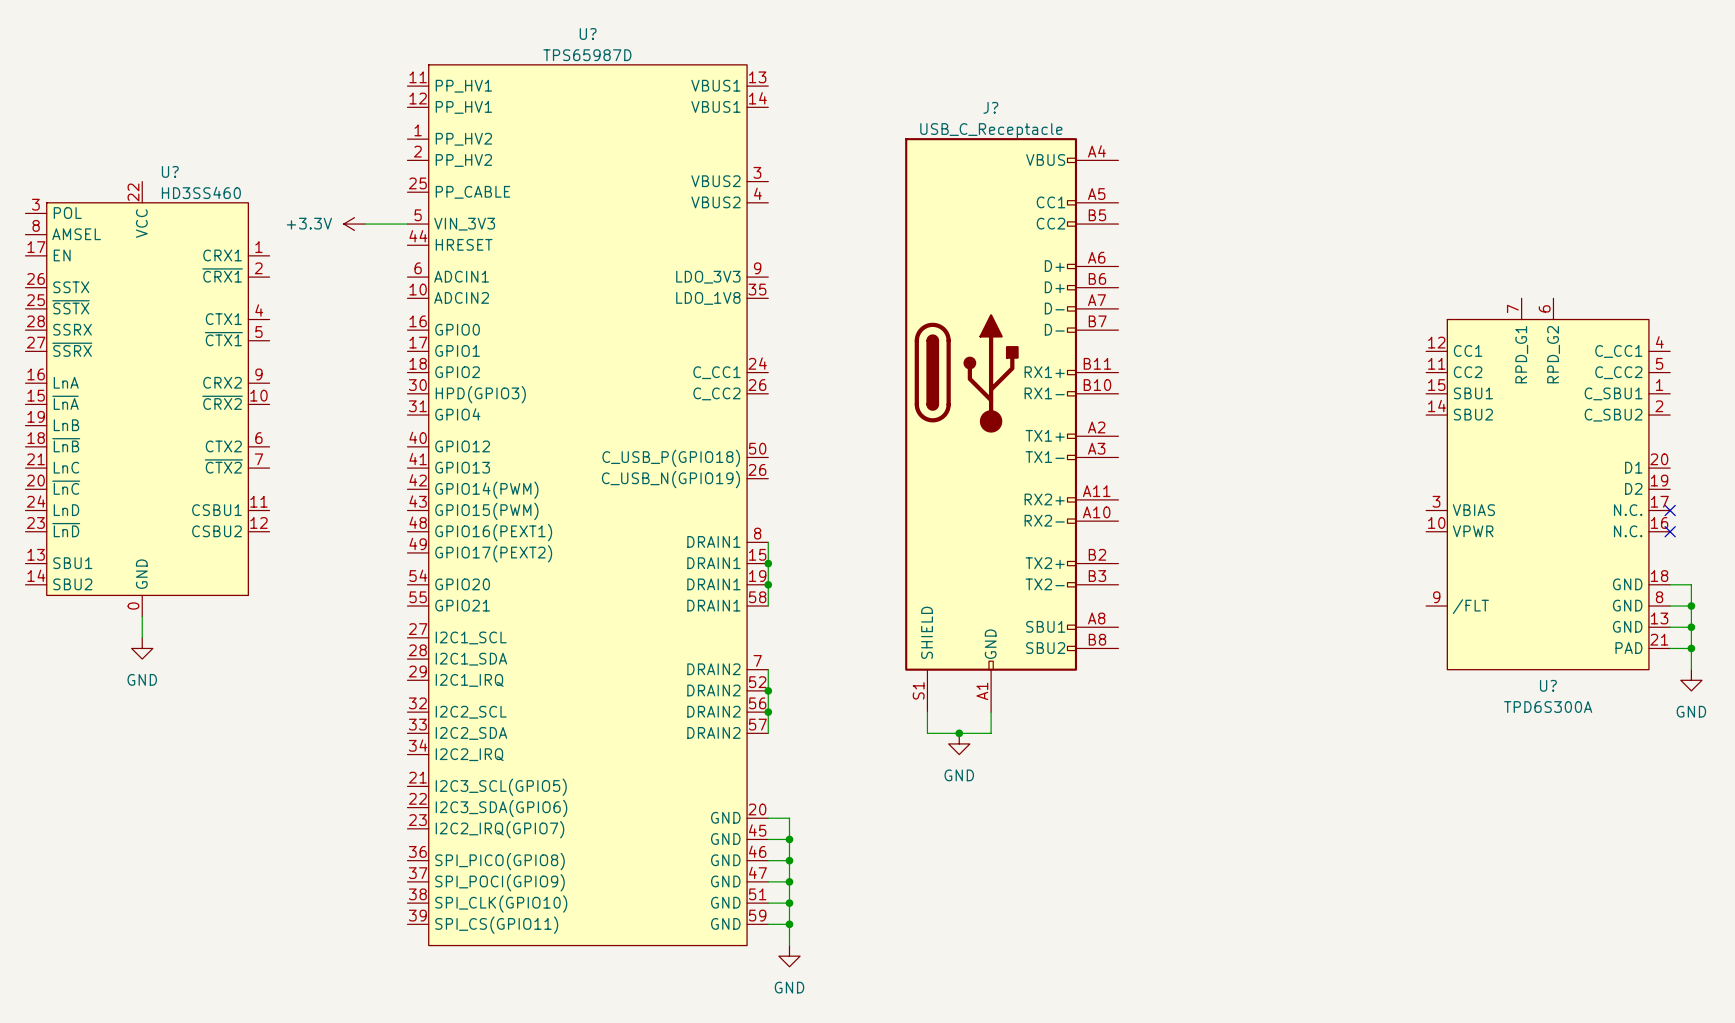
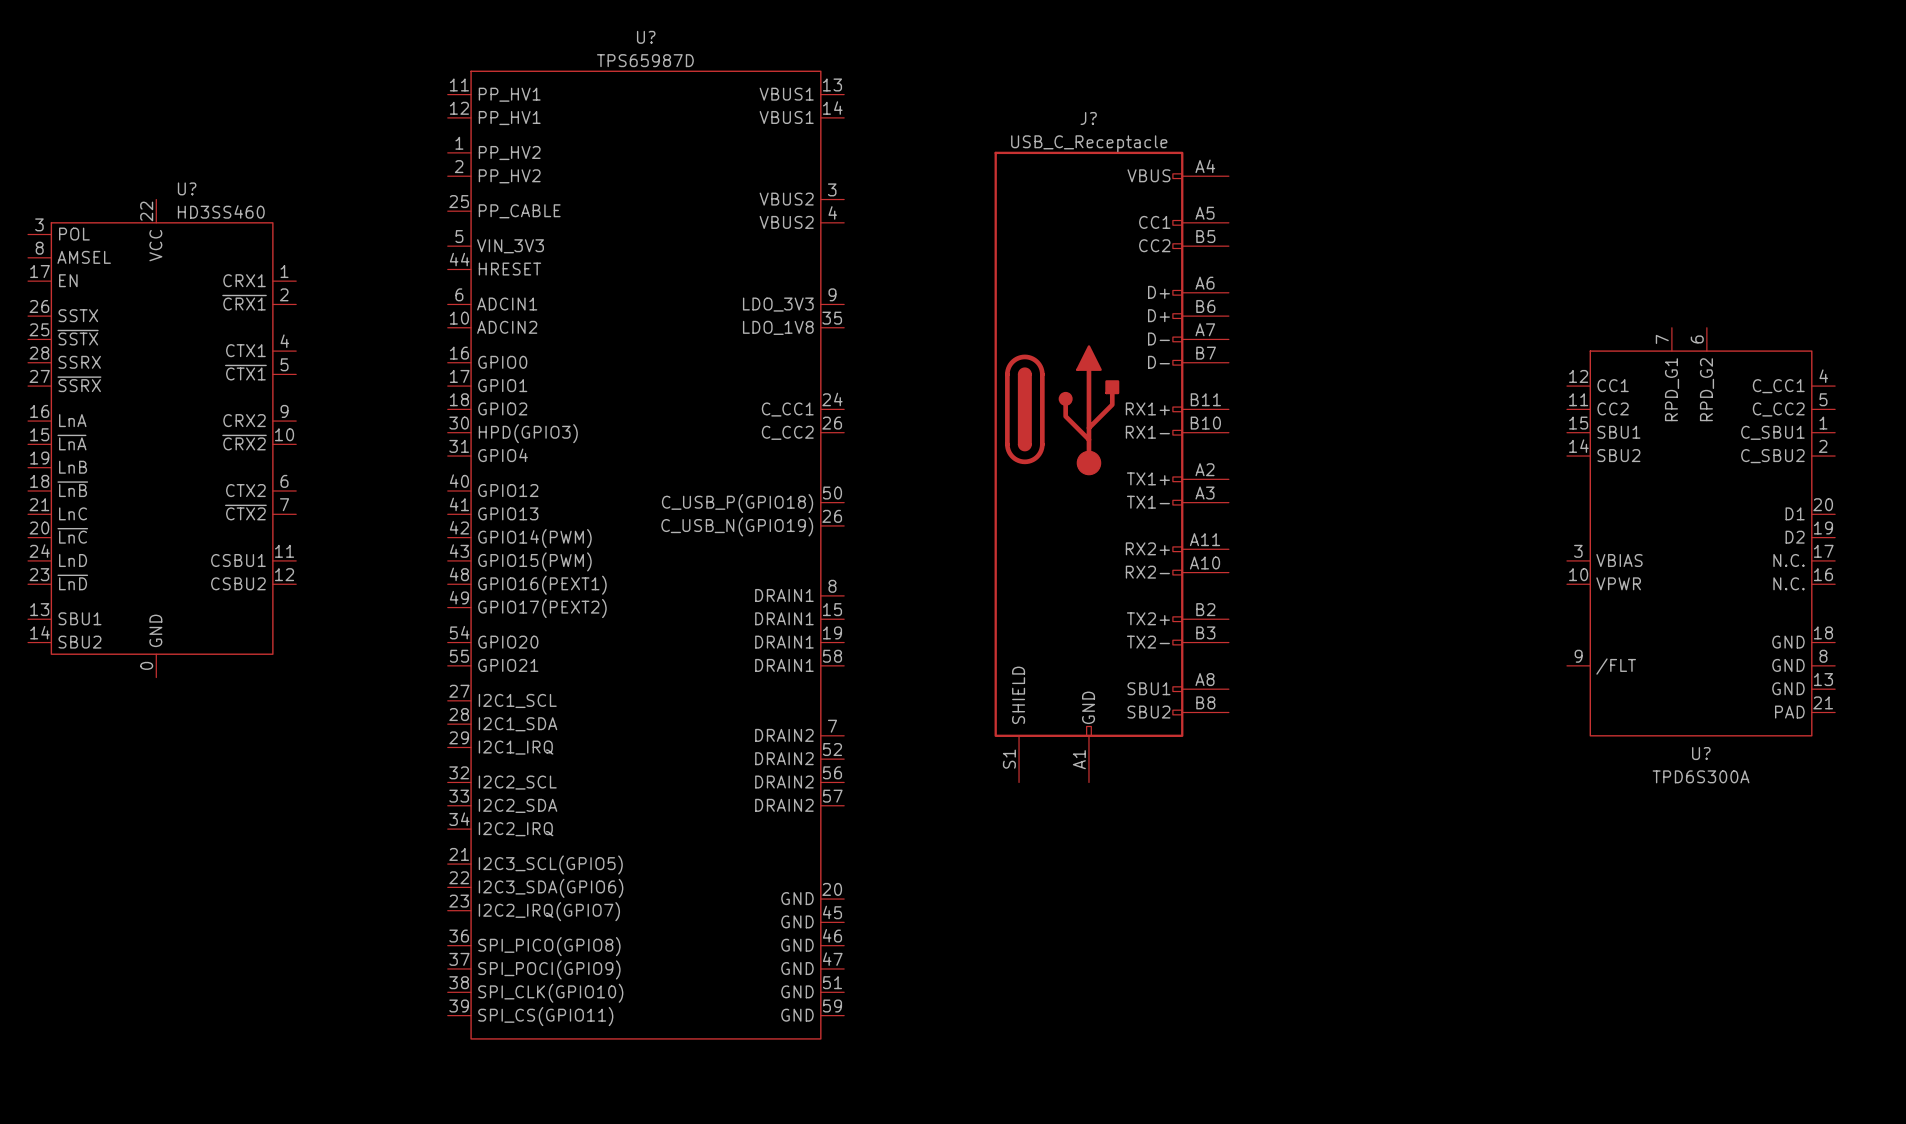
power symbol: +3.3V (354, 224) -> none
wire: (365, 224) (407, 224) -> none
no-connect mark: (1670, 510) -> none
no-connect mark: (1670, 531) -> none
wire: (768, 542) (768, 606) -> none
junction: (768, 563) -> none
junction: (768, 584) -> none
wire: (1670, 584) (1691, 584) (1691, 669) -> none
wire: (1670, 606) (1691, 606) -> none
junction: (1691, 606) -> none
wire: (142, 616) (142, 637) -> none
wire: (1670, 627) (1691, 627) -> none
junction: (1691, 627) -> none
power symbol: GND (142, 648) -> none
wire: (1670, 648) (1691, 648) -> none
junction: (1691, 648) -> none
wire: (768, 669) (768, 733) -> none
power symbol: GND (1691, 680) -> none
junction: (768, 690) -> none
junction: (768, 712) -> none
wire: (927, 712) (927, 733) (991, 733) (991, 712) -> none
junction: (959, 733) -> none
power symbol: GND (959, 743) -> none
wire: (768, 818) (789, 818) (789, 945) -> none
wire: (768, 839) (789, 839) -> none
junction: (789, 839) -> none
wire: (768, 860) (789, 860) -> none
junction: (789, 860) -> none
wire: (768, 881) (789, 881) -> none
junction: (789, 881) -> none
wire: (768, 903) (789, 903) -> none
junction: (789, 903) -> none
wire: (768, 924) (789, 924) -> none
junction: (789, 924) -> none
power symbol: GND (789, 956) -> none

